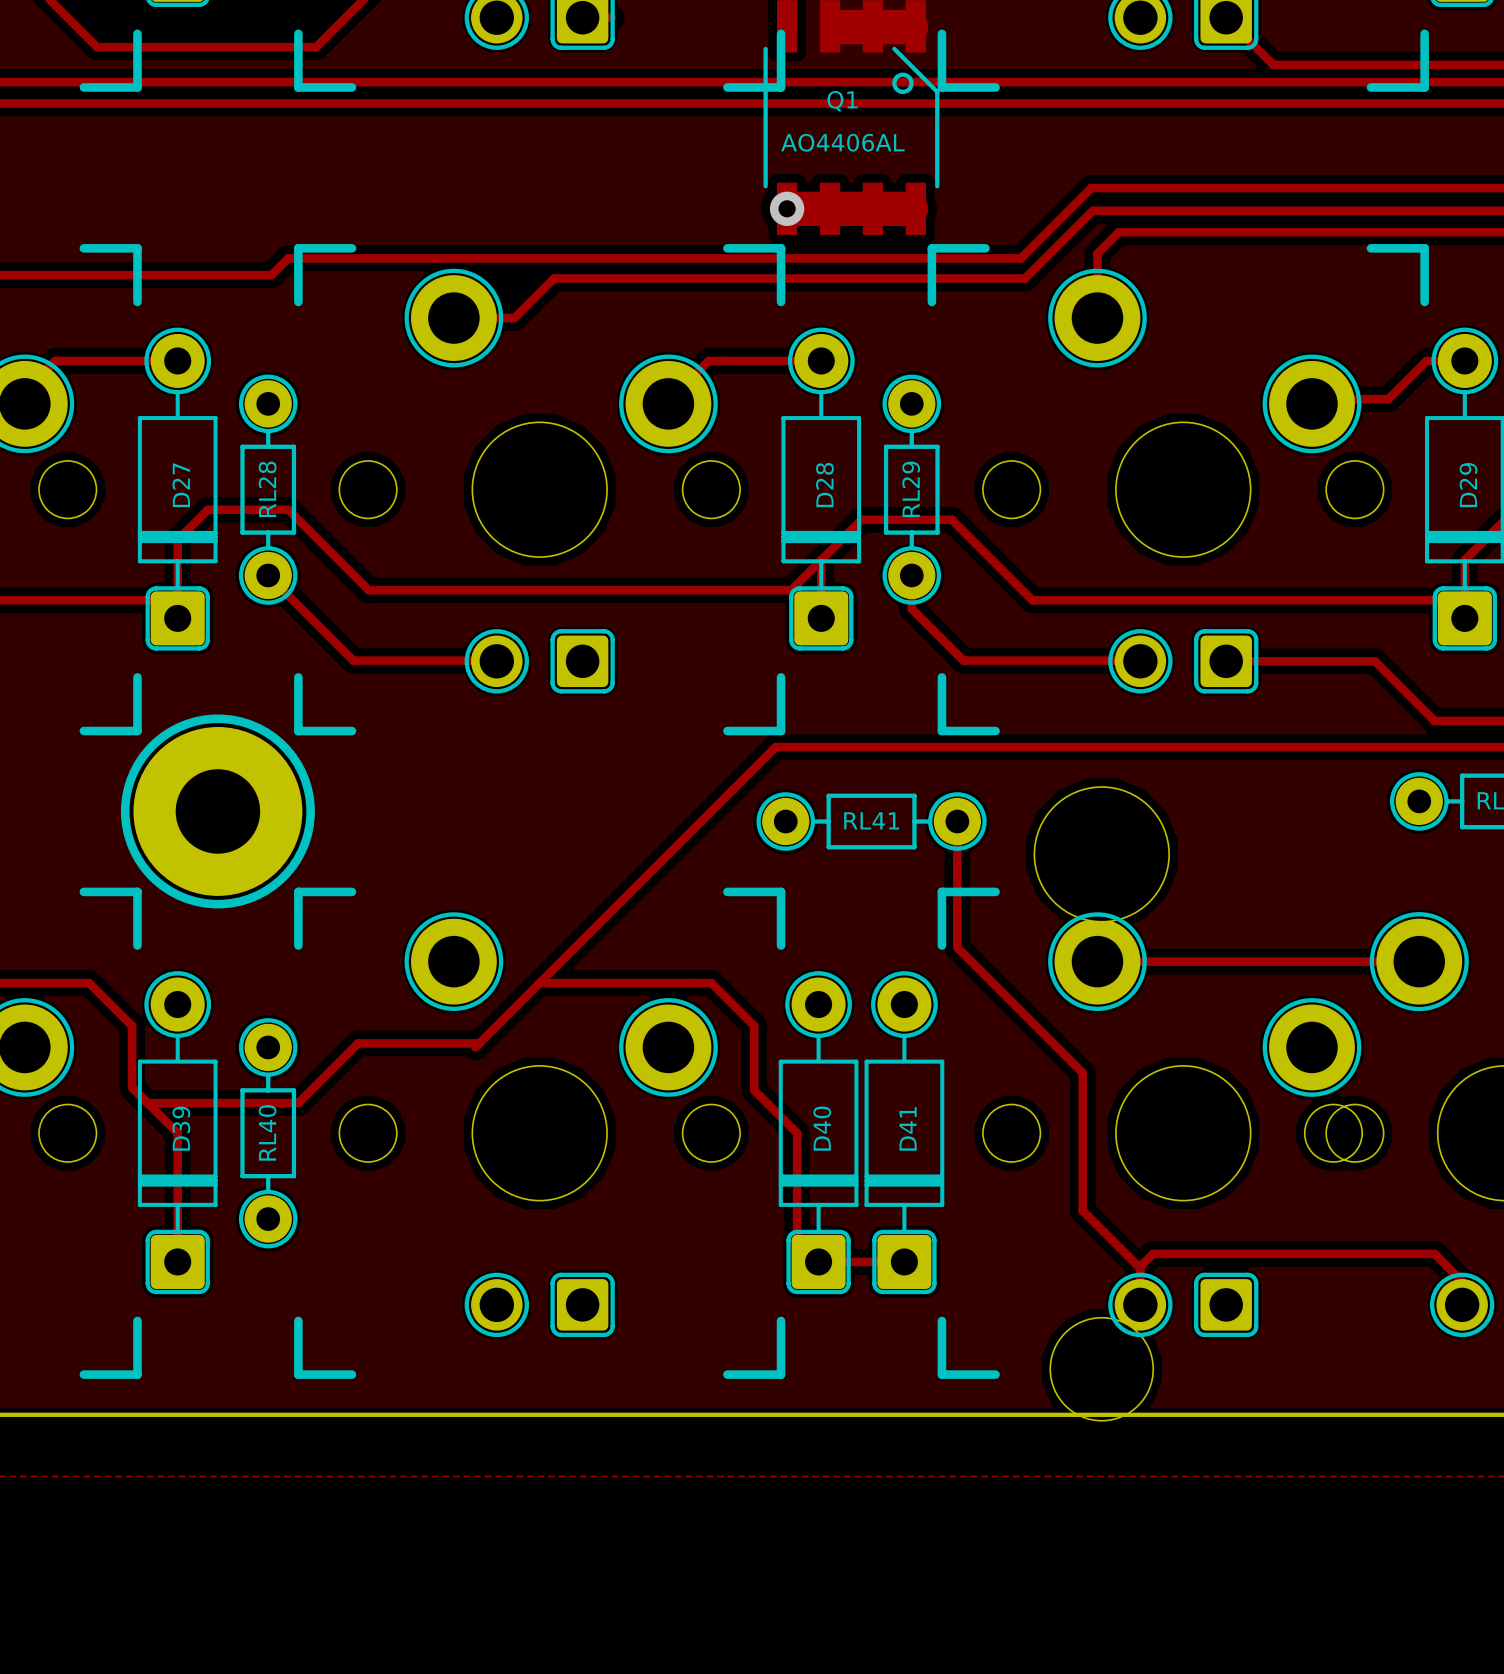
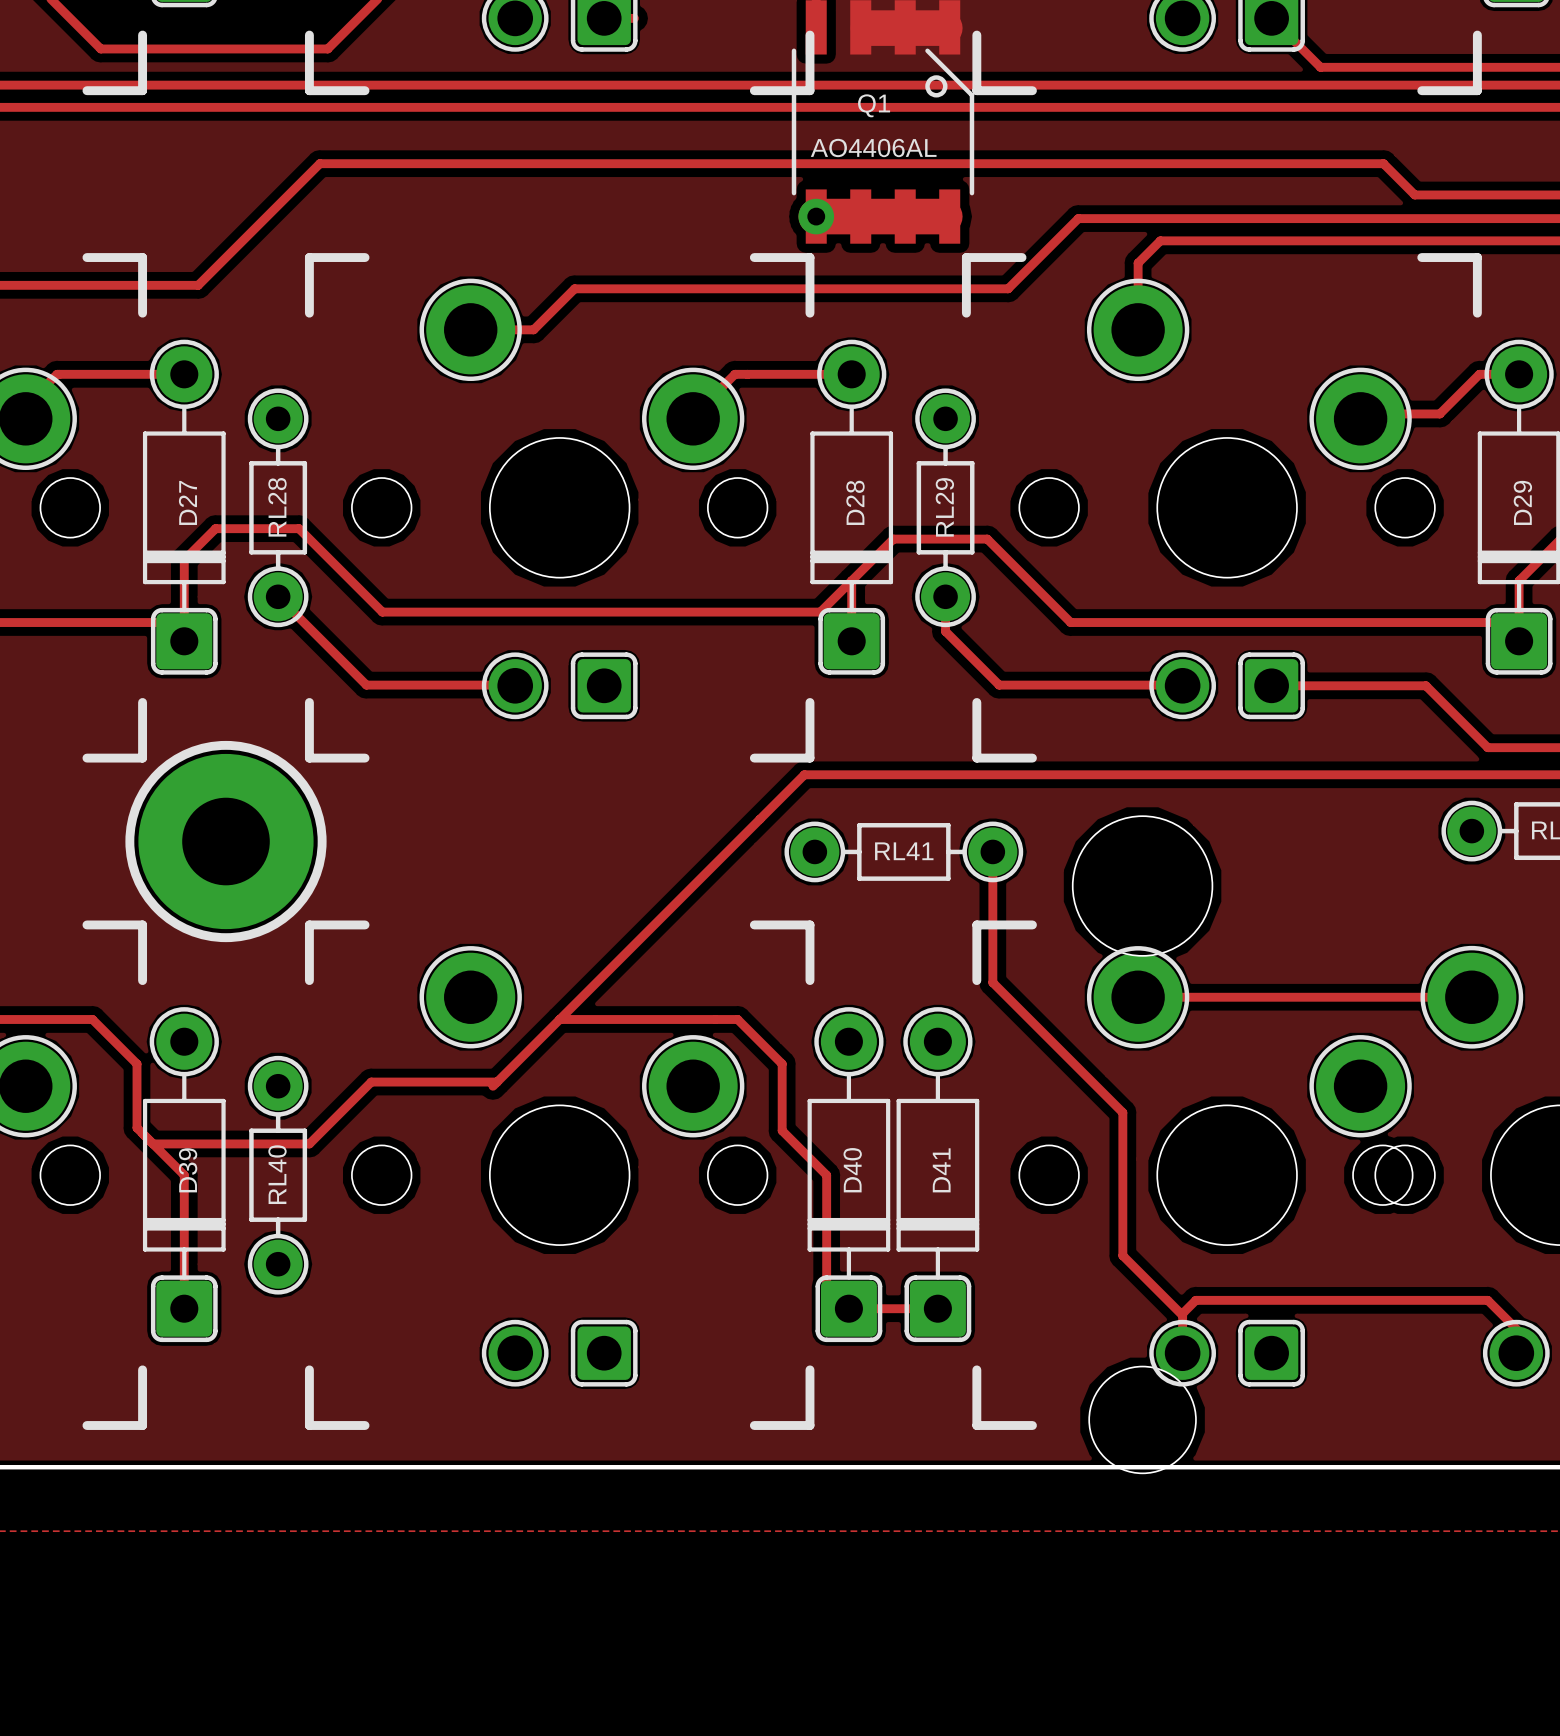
track: (1364, 188) (1091, 188) (1020, 258) (288, 258) (271, 275) (191, 275) -> (1414, 194) (1383, 163) (319, 163) (198, 285)
track: (1092, 210) (1025, 278) (972, 278) -> (1133, 218) (1078, 218) (1008, 288)

